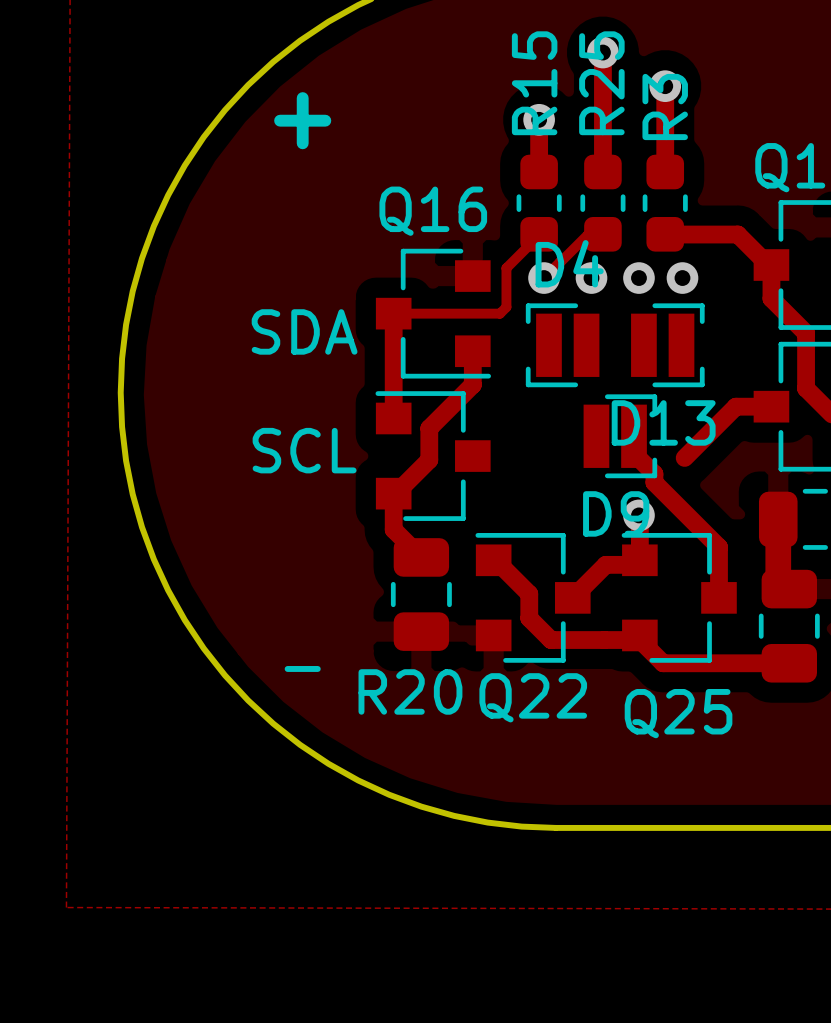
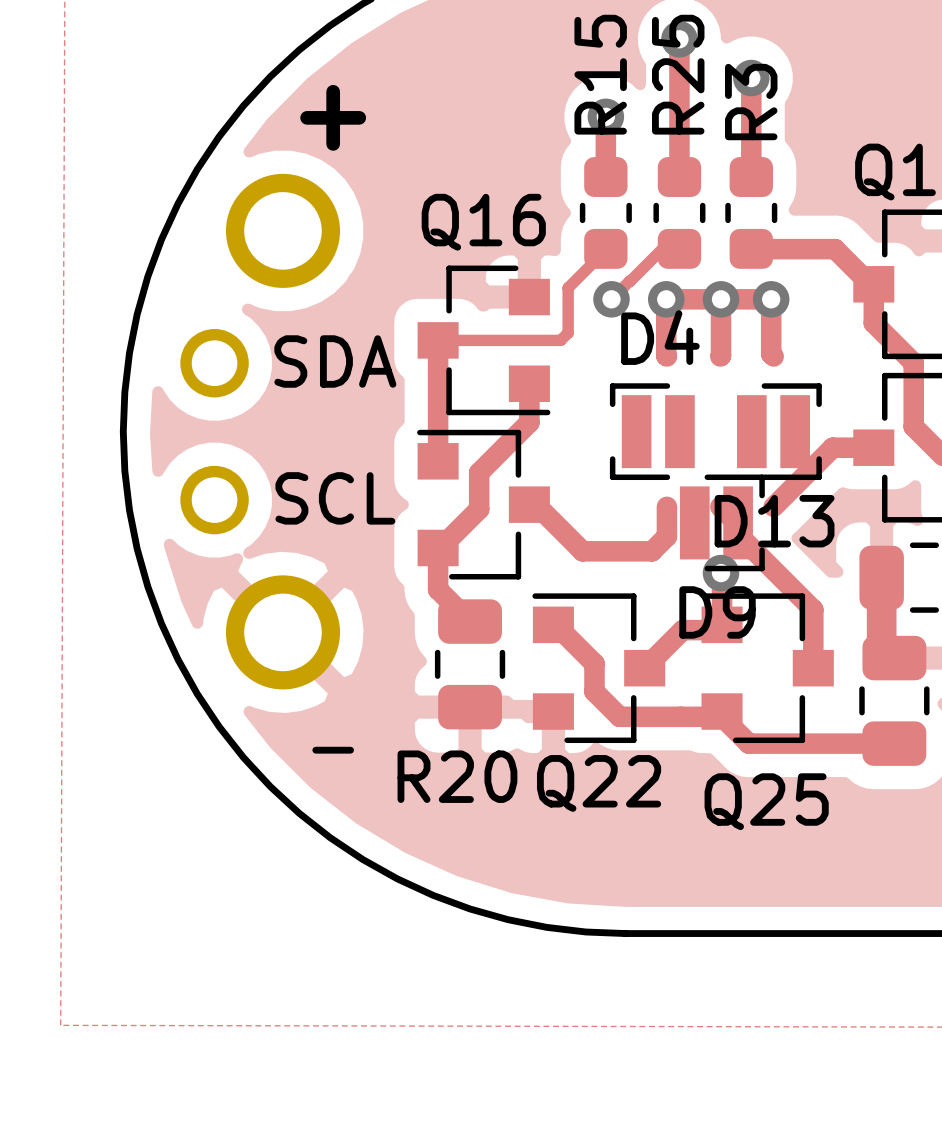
track: none -> (721, 299) (720, 356)
track: none -> (666, 356) (666, 299) (771, 299) (771, 353) (773, 356)
D4 position: (562, 345) -> (652, 431)
D13 position: (667, 345) -> (779, 431)
part: none -> (260, 431)
D9 position: (620, 436) -> (722, 522)
track: none -> (535, 504) (582, 551) (652, 551) (666, 536) (666, 506)

